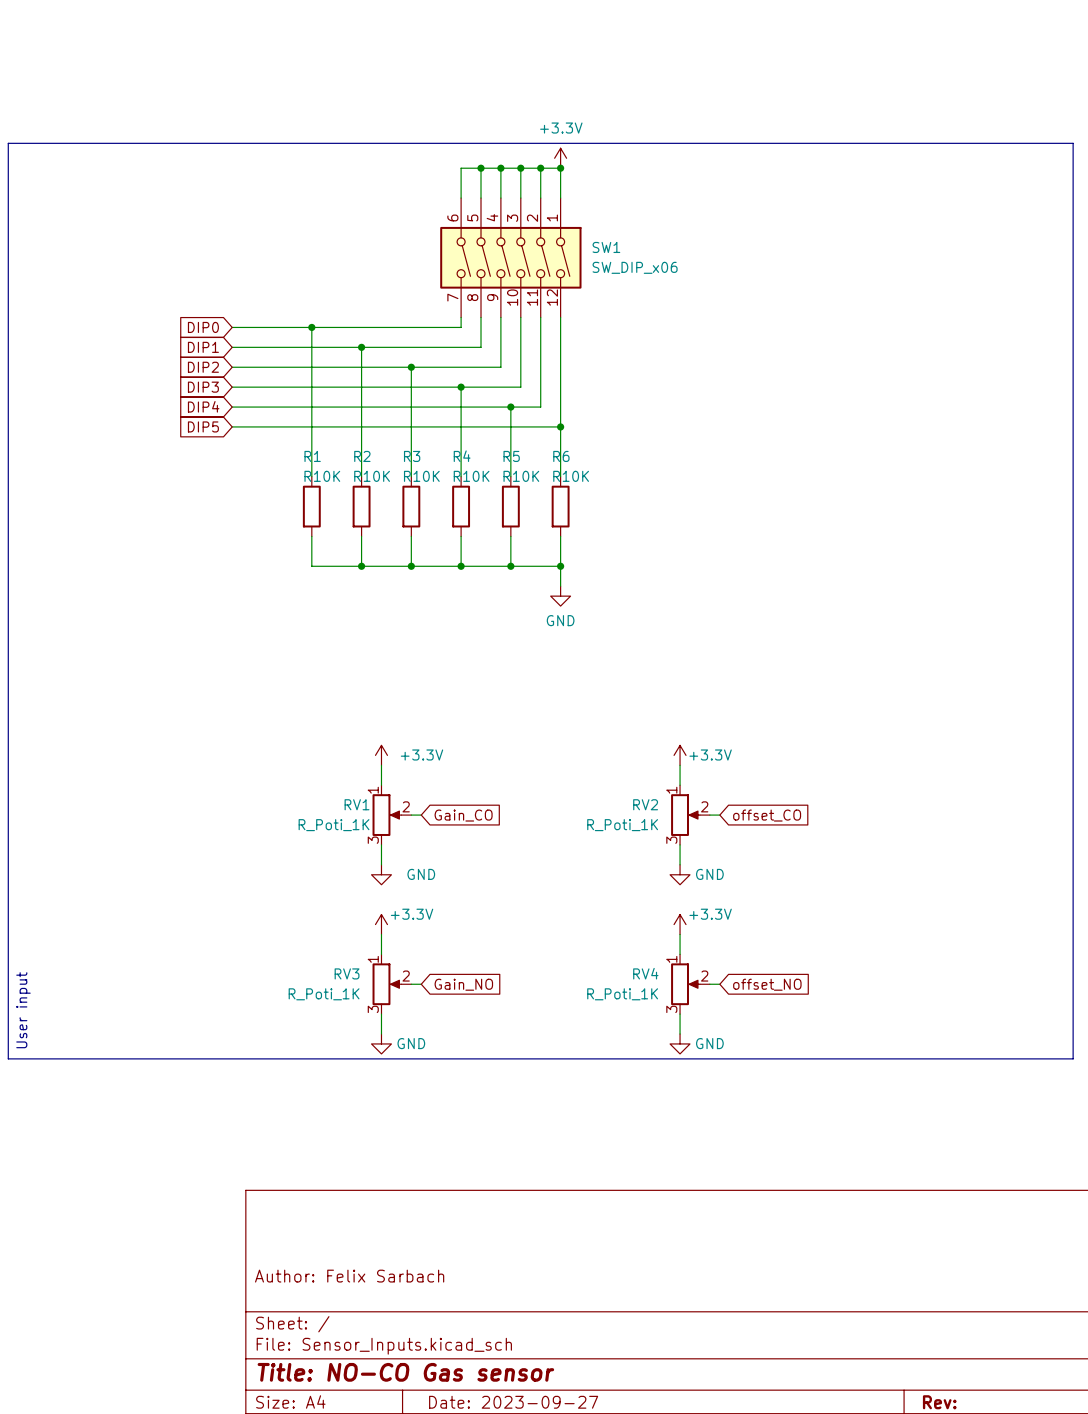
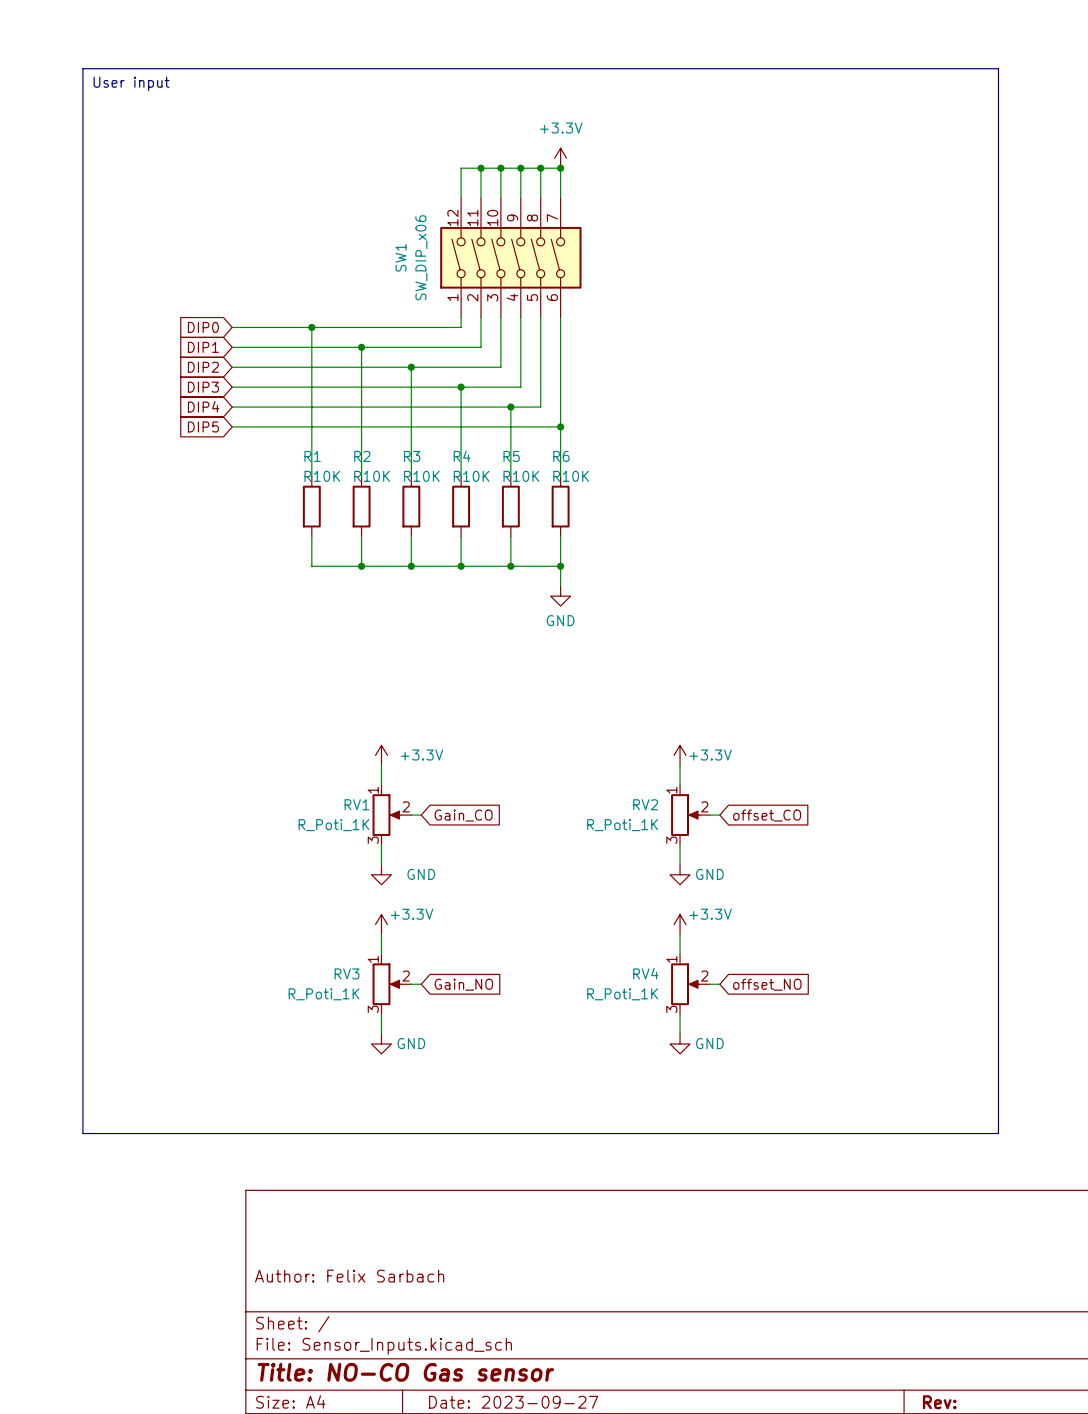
text: none -> User input (131, 83)
line: (8, 143) (1073, 143) (1073, 1058) (8, 1058) (8, 143) -> (82, 68) (82, 1133) (998, 1133) (998, 68) (82, 68)
SW1 rotation: 0° (510, 257) -> 180° (510, 257)
SW1 value position: SW_DIP_x06 (635, 267) -> SW_DIP_x06 (421, 257)
text: User input (23, 1010) -> none

